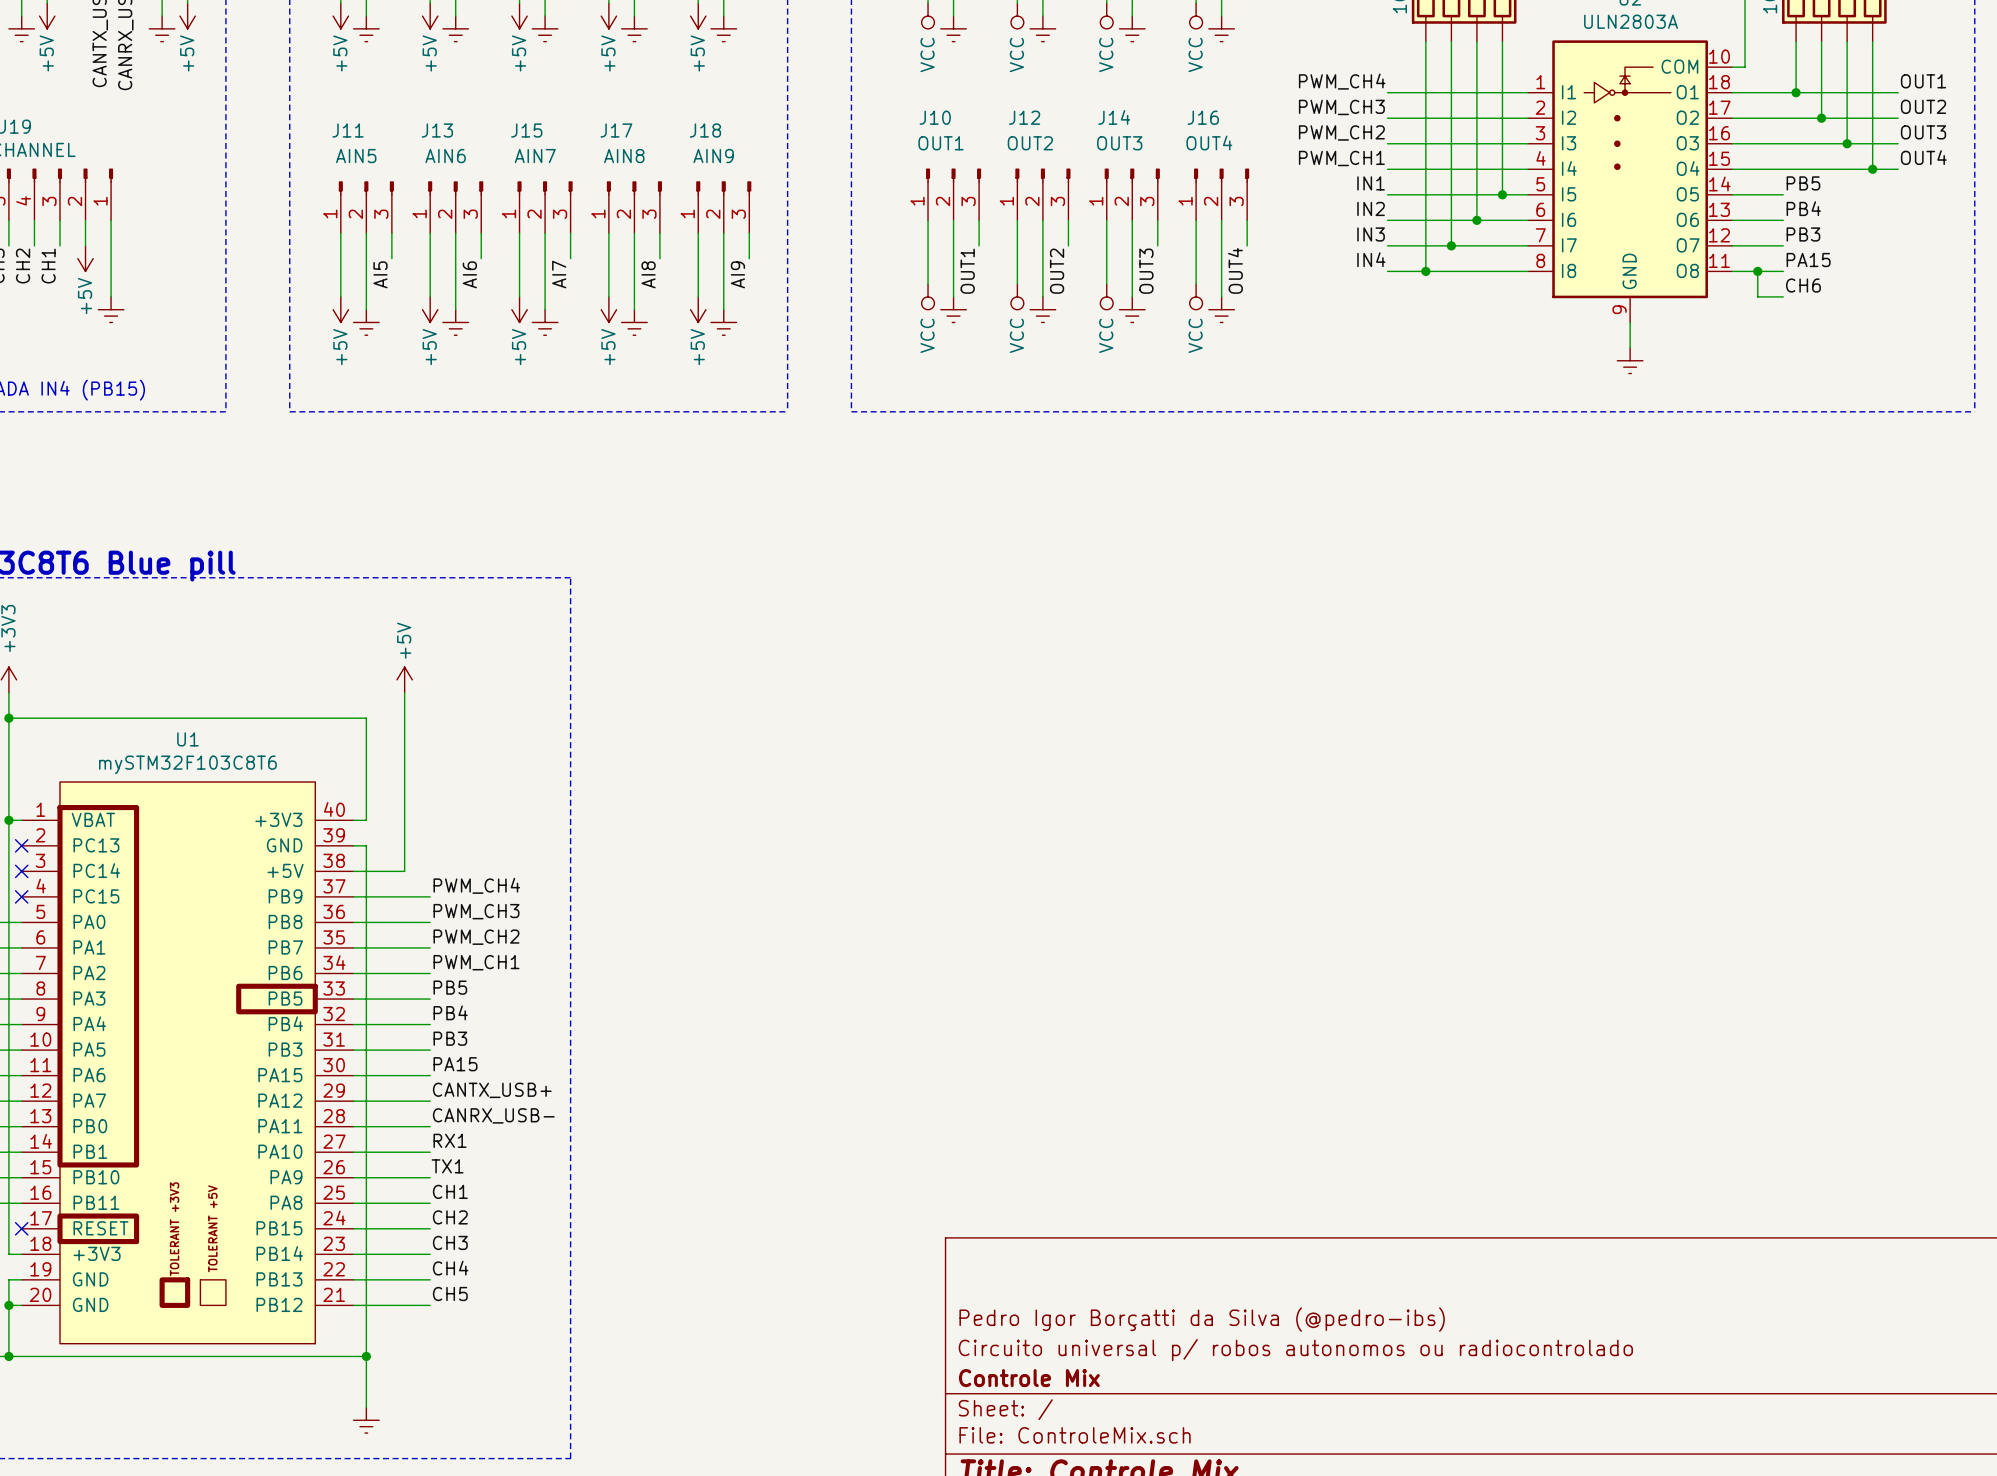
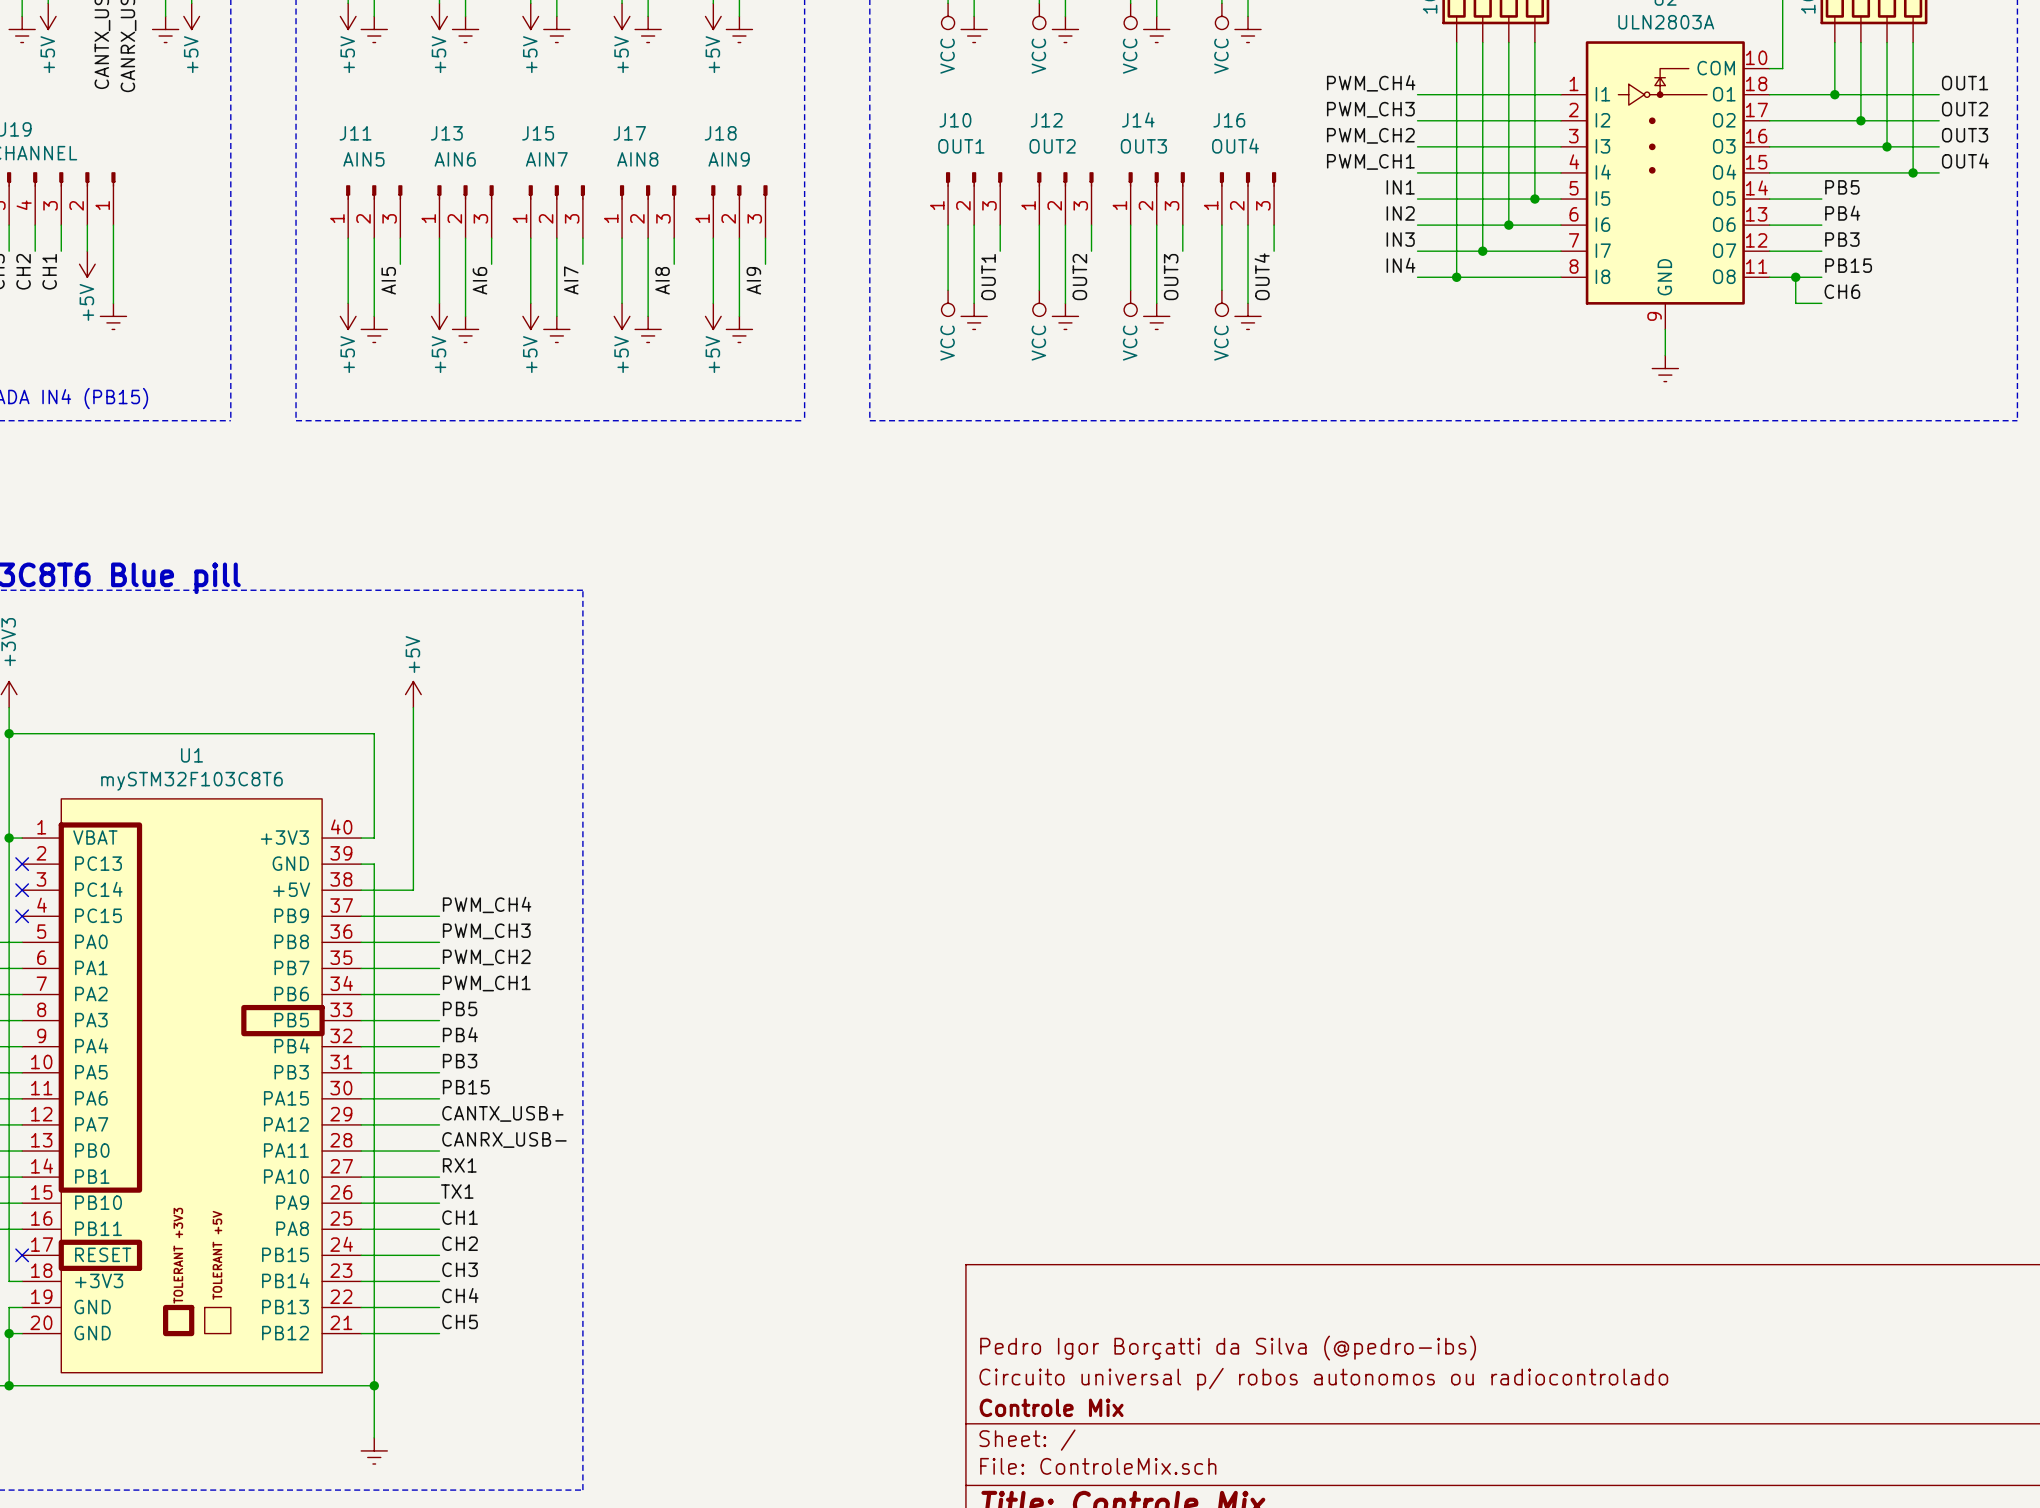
label: PA15 (1808, 260) -> PB15 (1848, 265)
label: PA15 (455, 1064) -> PB15 (466, 1087)

